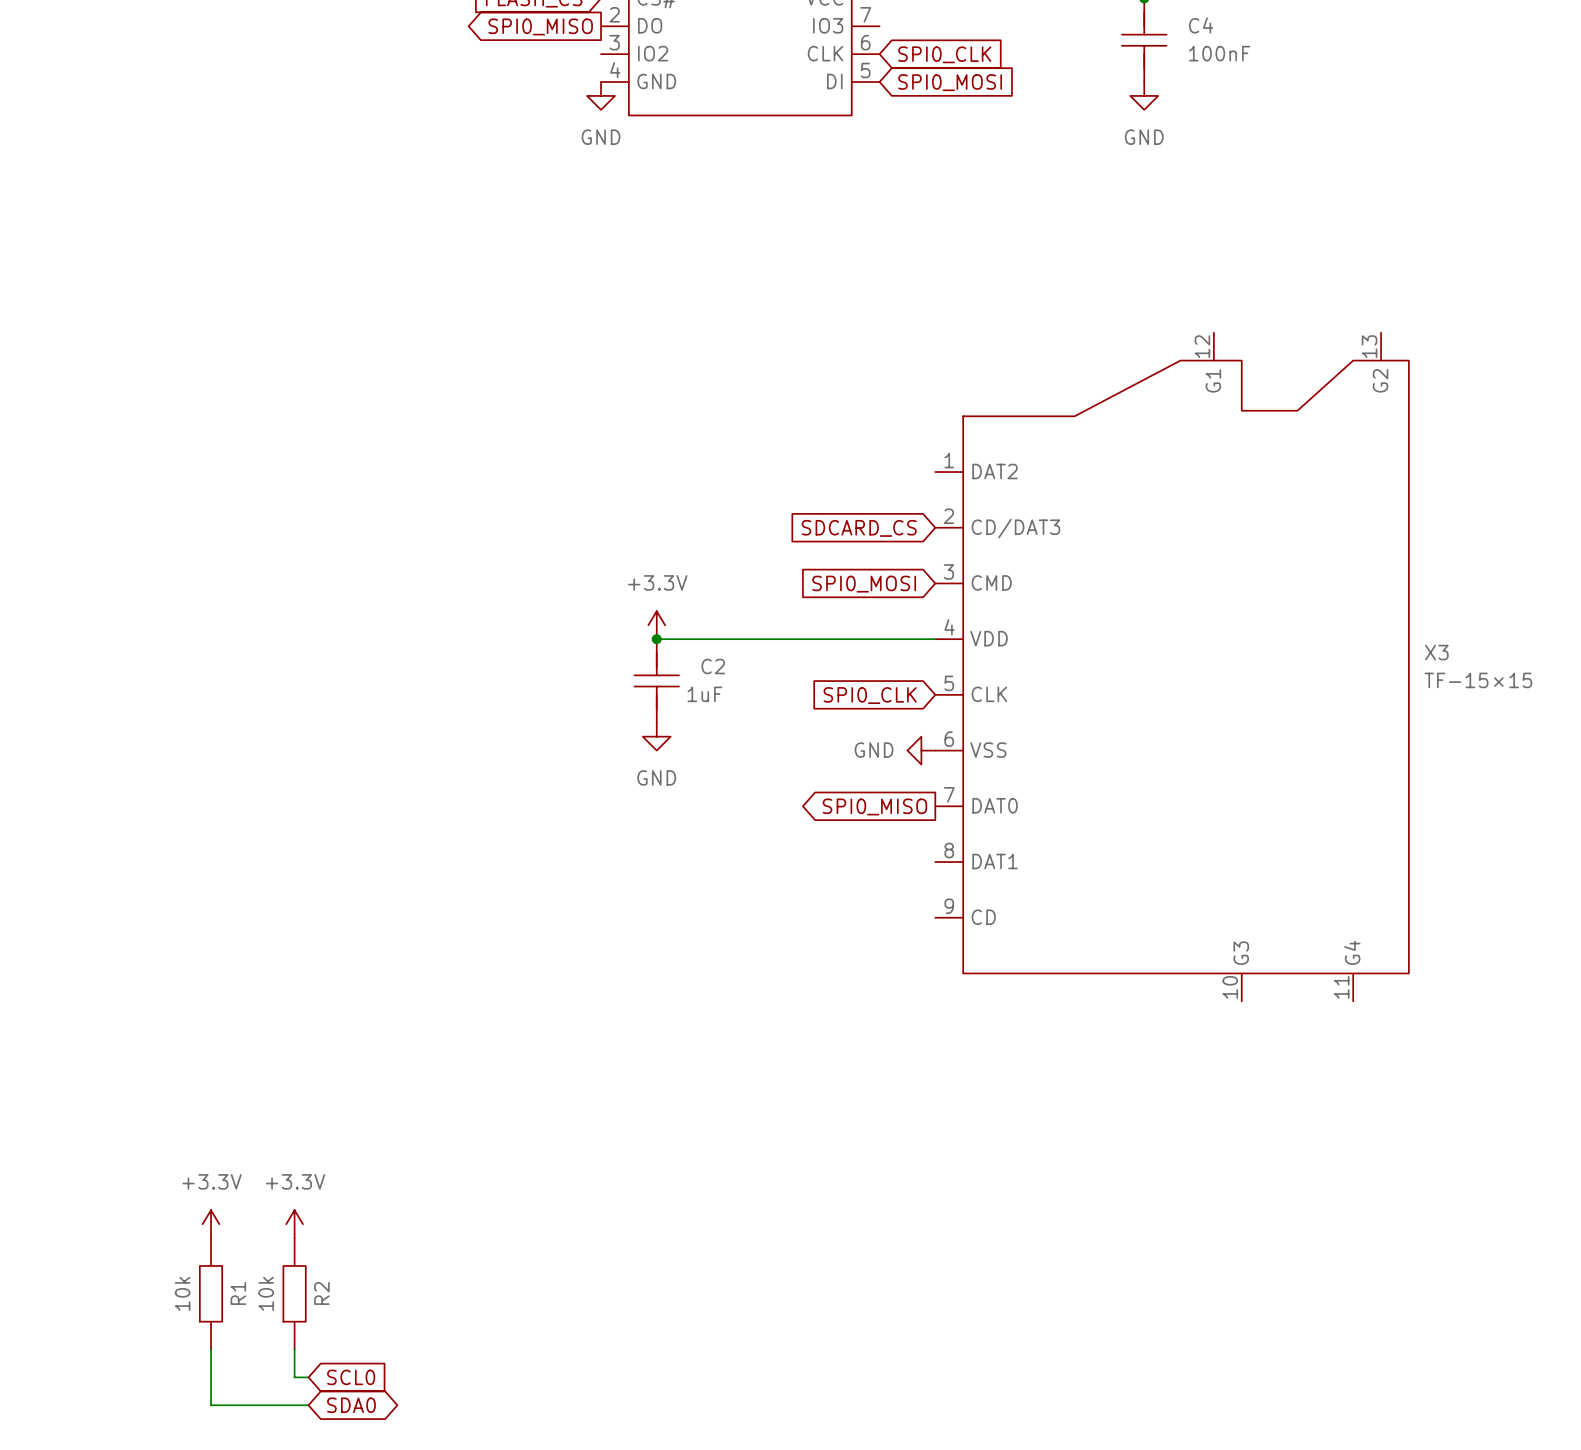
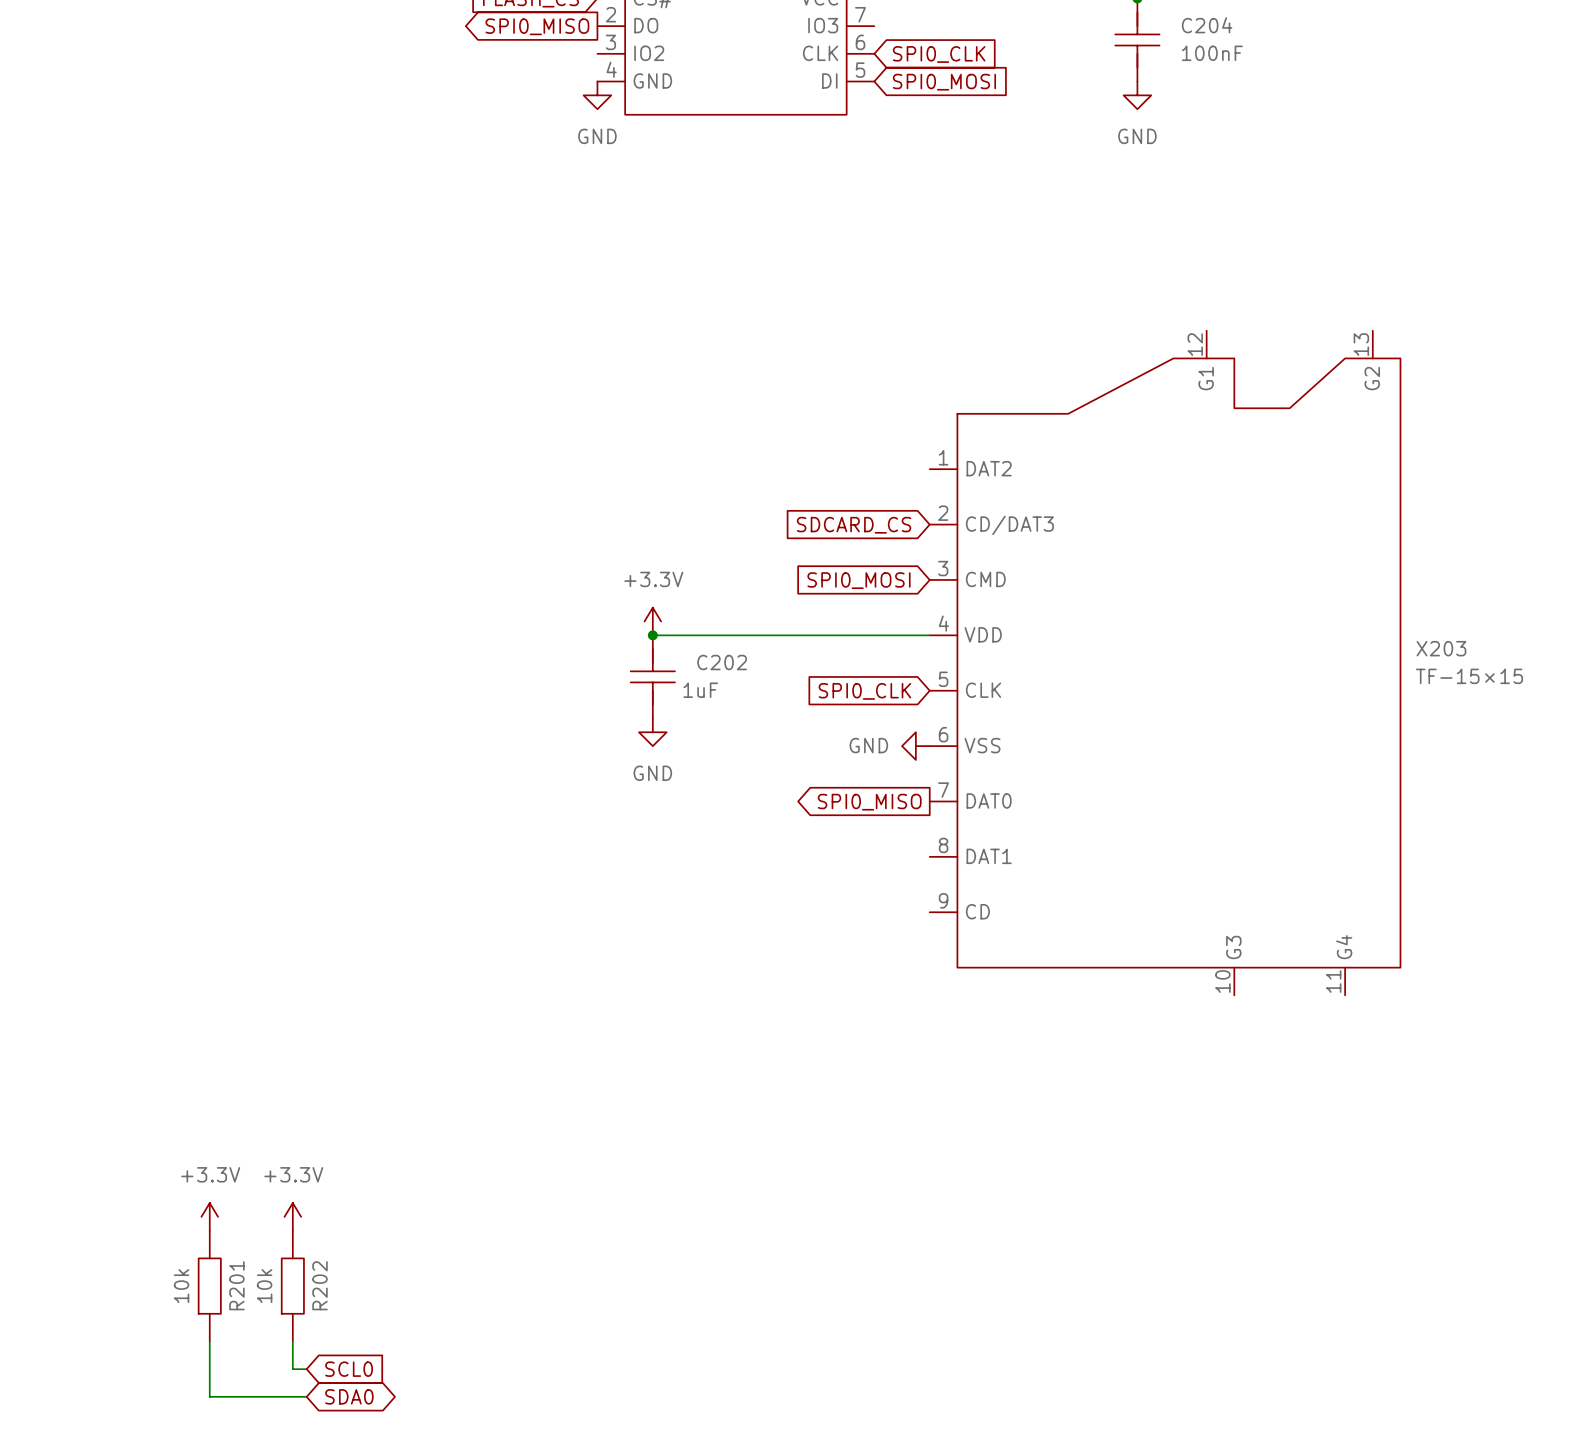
C4 name: C4 (1201, 25) -> C204 (1207, 25)
X3 name: X3 (1436, 652) -> X203 (1441, 648)
C2 name: C2 (713, 666) -> C202 (722, 662)
R1 name: R1 (238, 1293) -> R201 (236, 1285)
R2 name: R2 (321, 1293) -> R202 (320, 1285)

